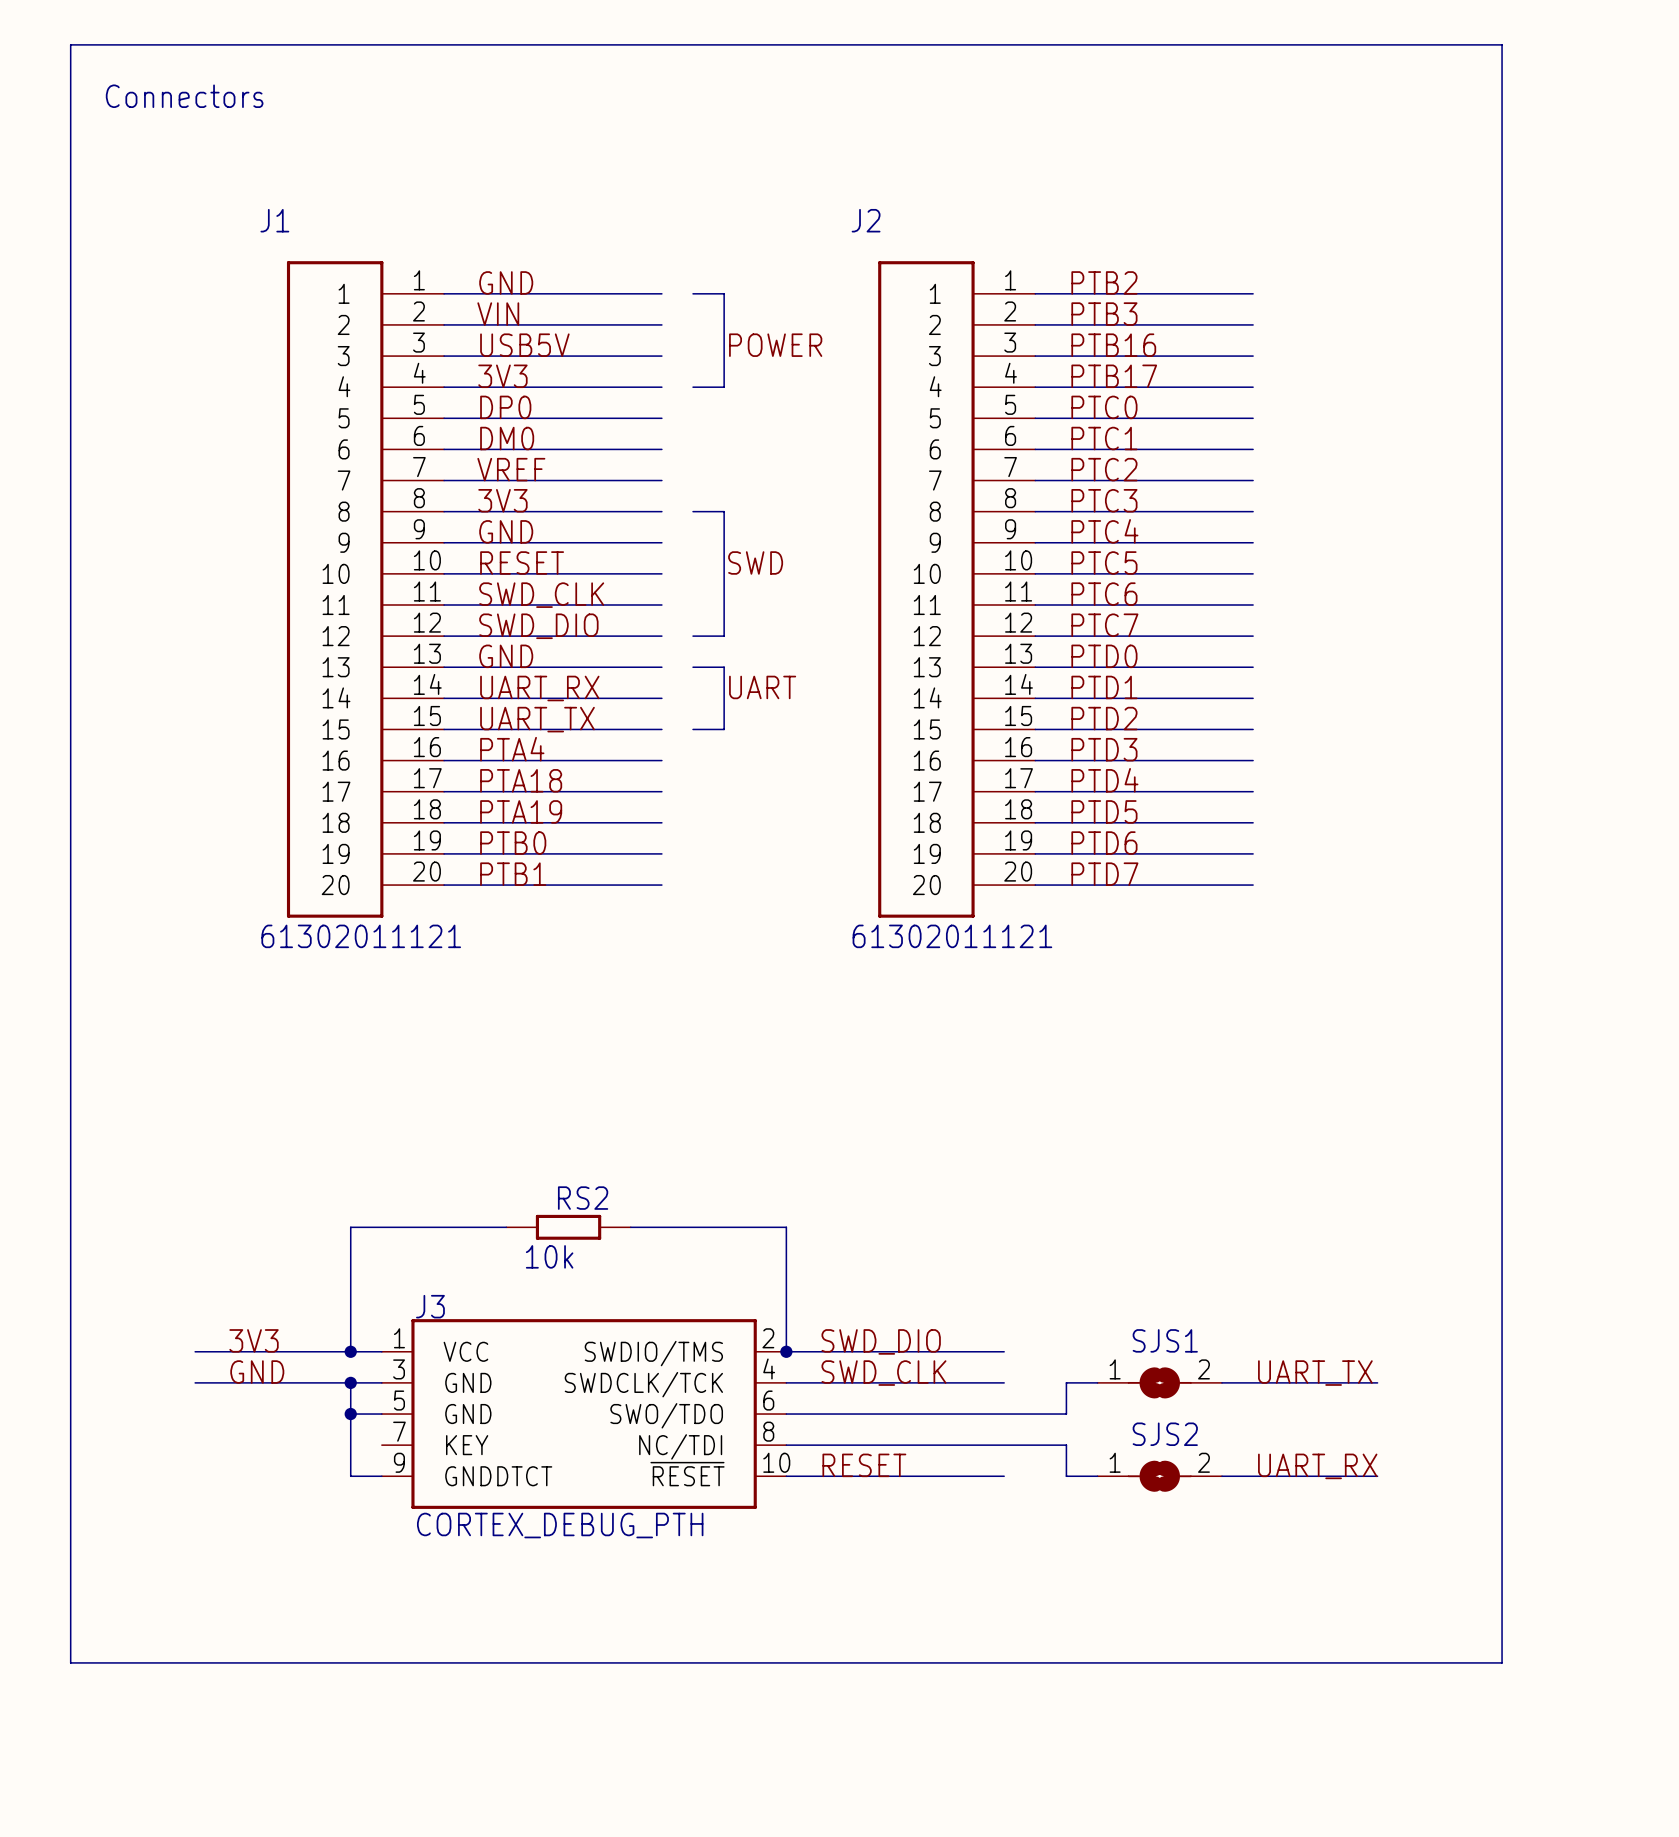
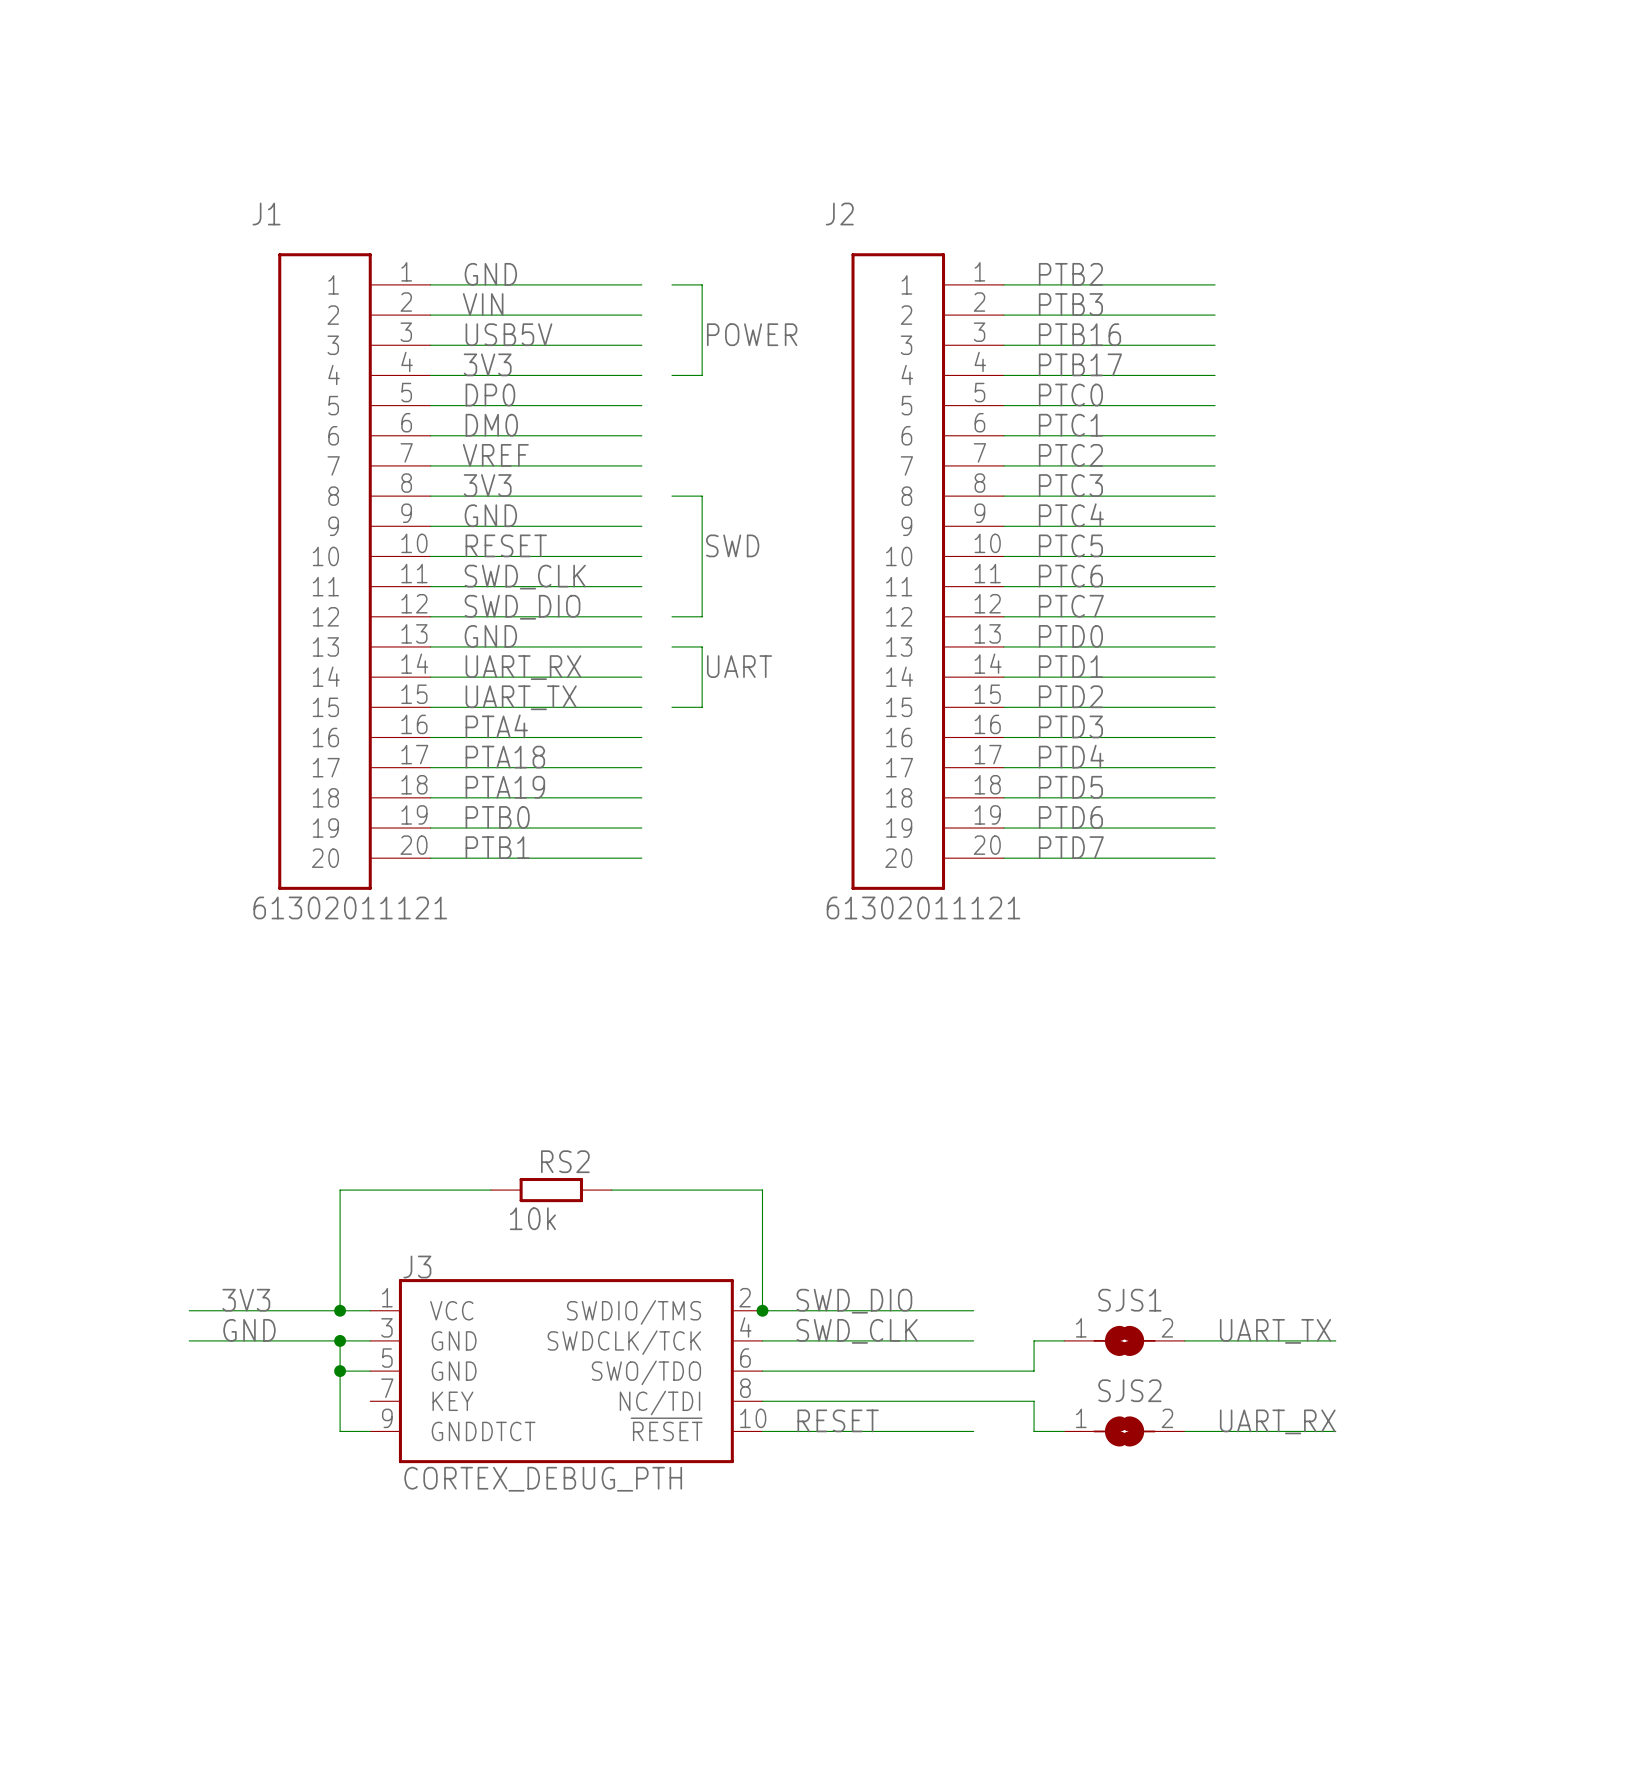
wire: (70, 44) (70, 1662) (1502, 1662) (1502, 44) (70, 44) -> none
text: Connectors (184, 96) -> none

